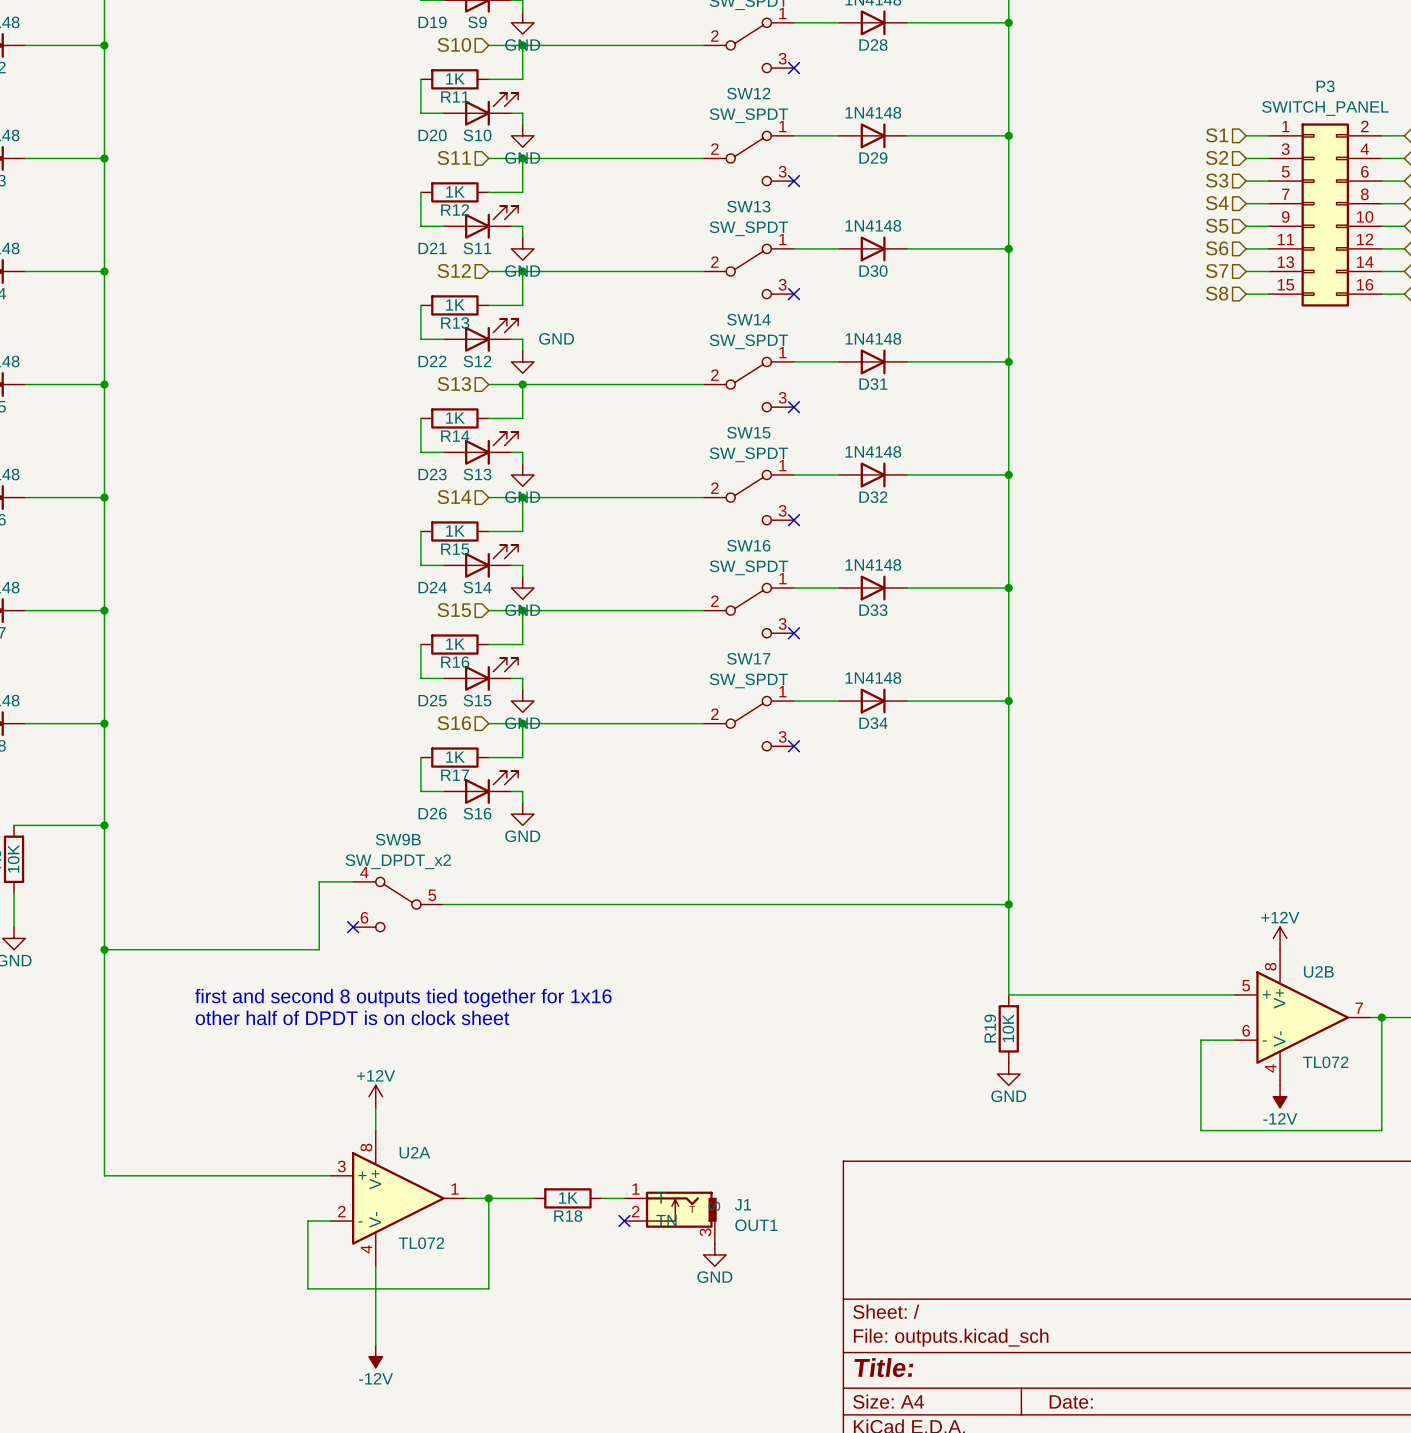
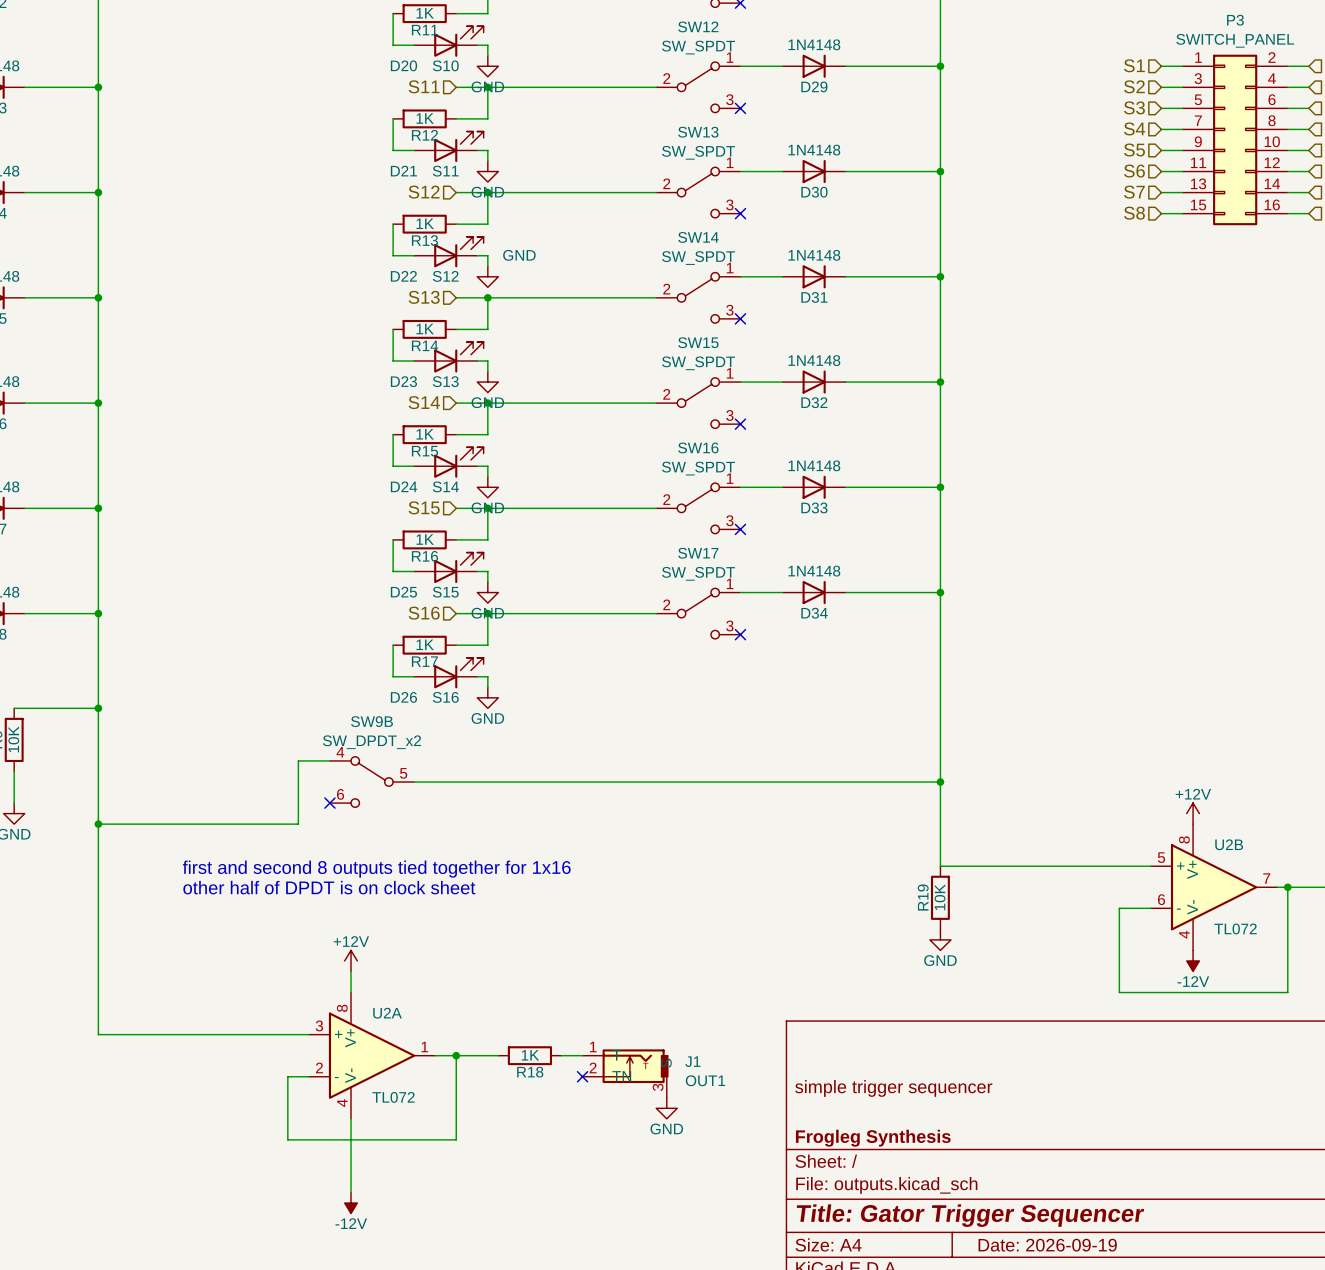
title block: none -> simple trigger sequencer (893, 1088)
title block: none -> Frogleg Synthesis (873, 1138)
title block: Title: (883, 1367) -> Title: Gator Trigger Sequencer (970, 1215)
title block: Date: (1071, 1402) -> Date: 2026-09-19 (1047, 1245)

